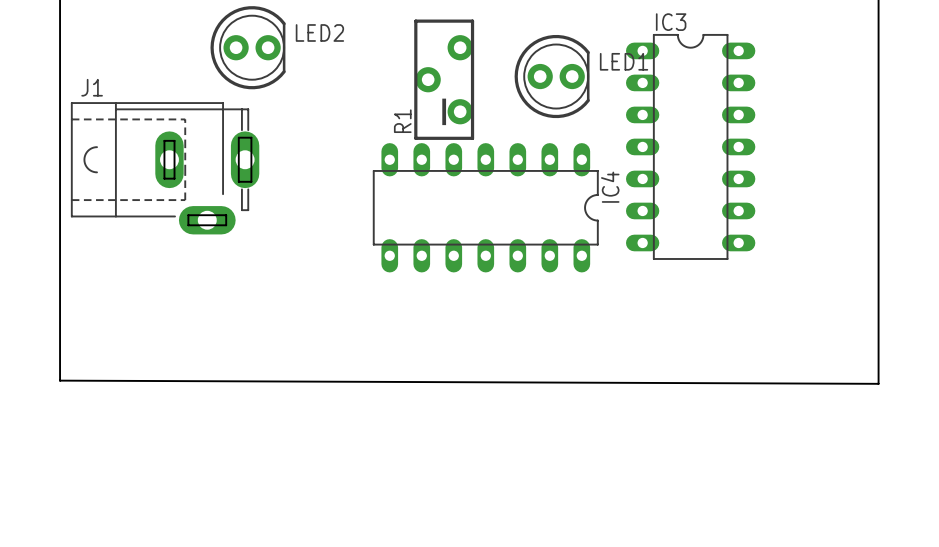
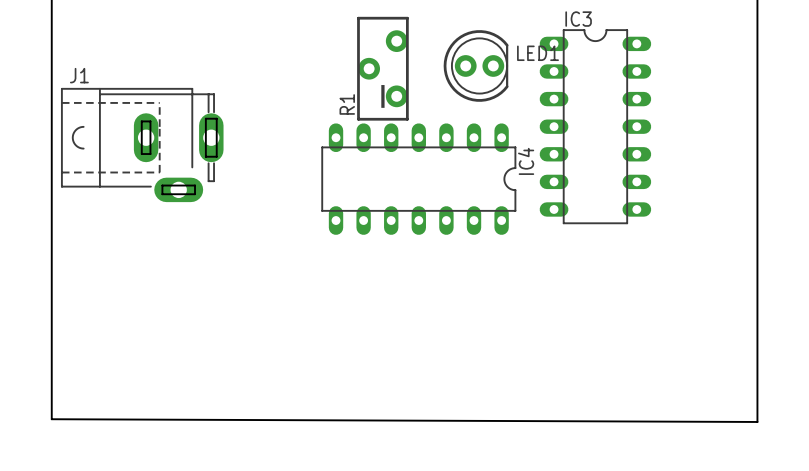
LED2: (248, 47) -> none
board edge: (60, 380) (878, 383) -> (51, 328) (51, 419) (757, 421) (757, 330)

